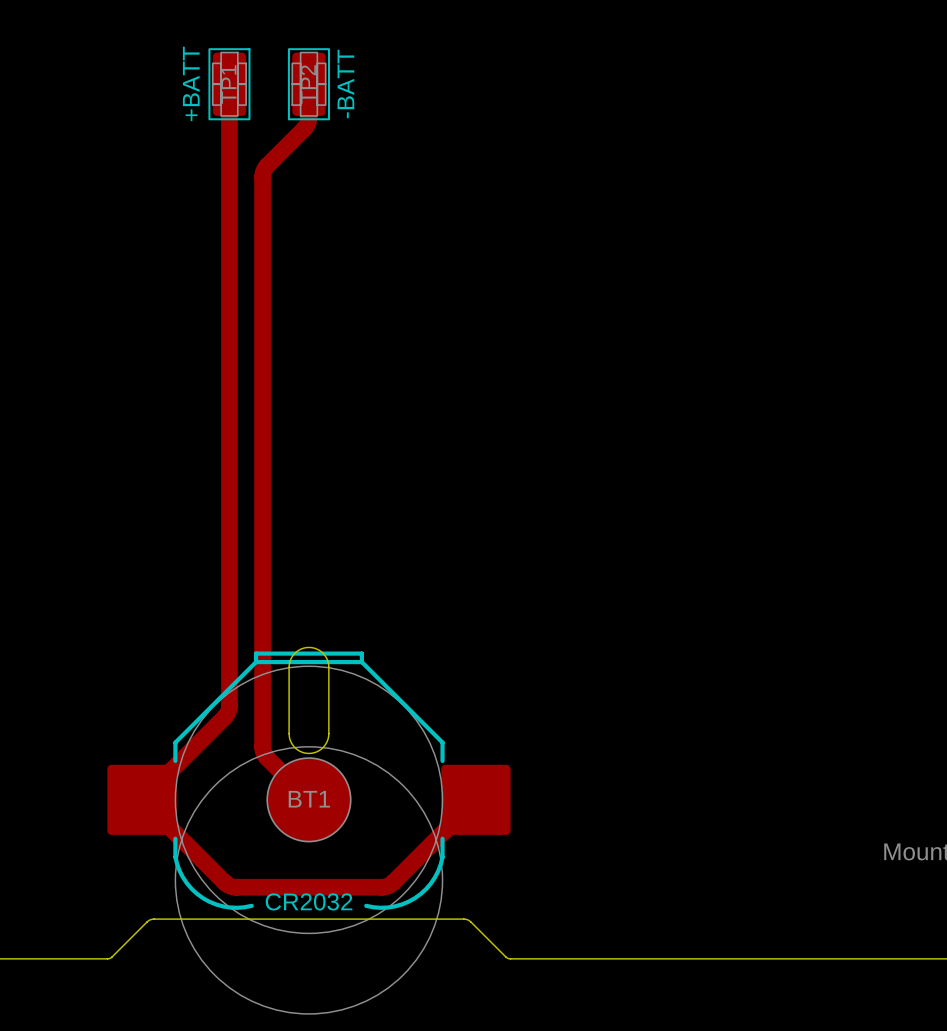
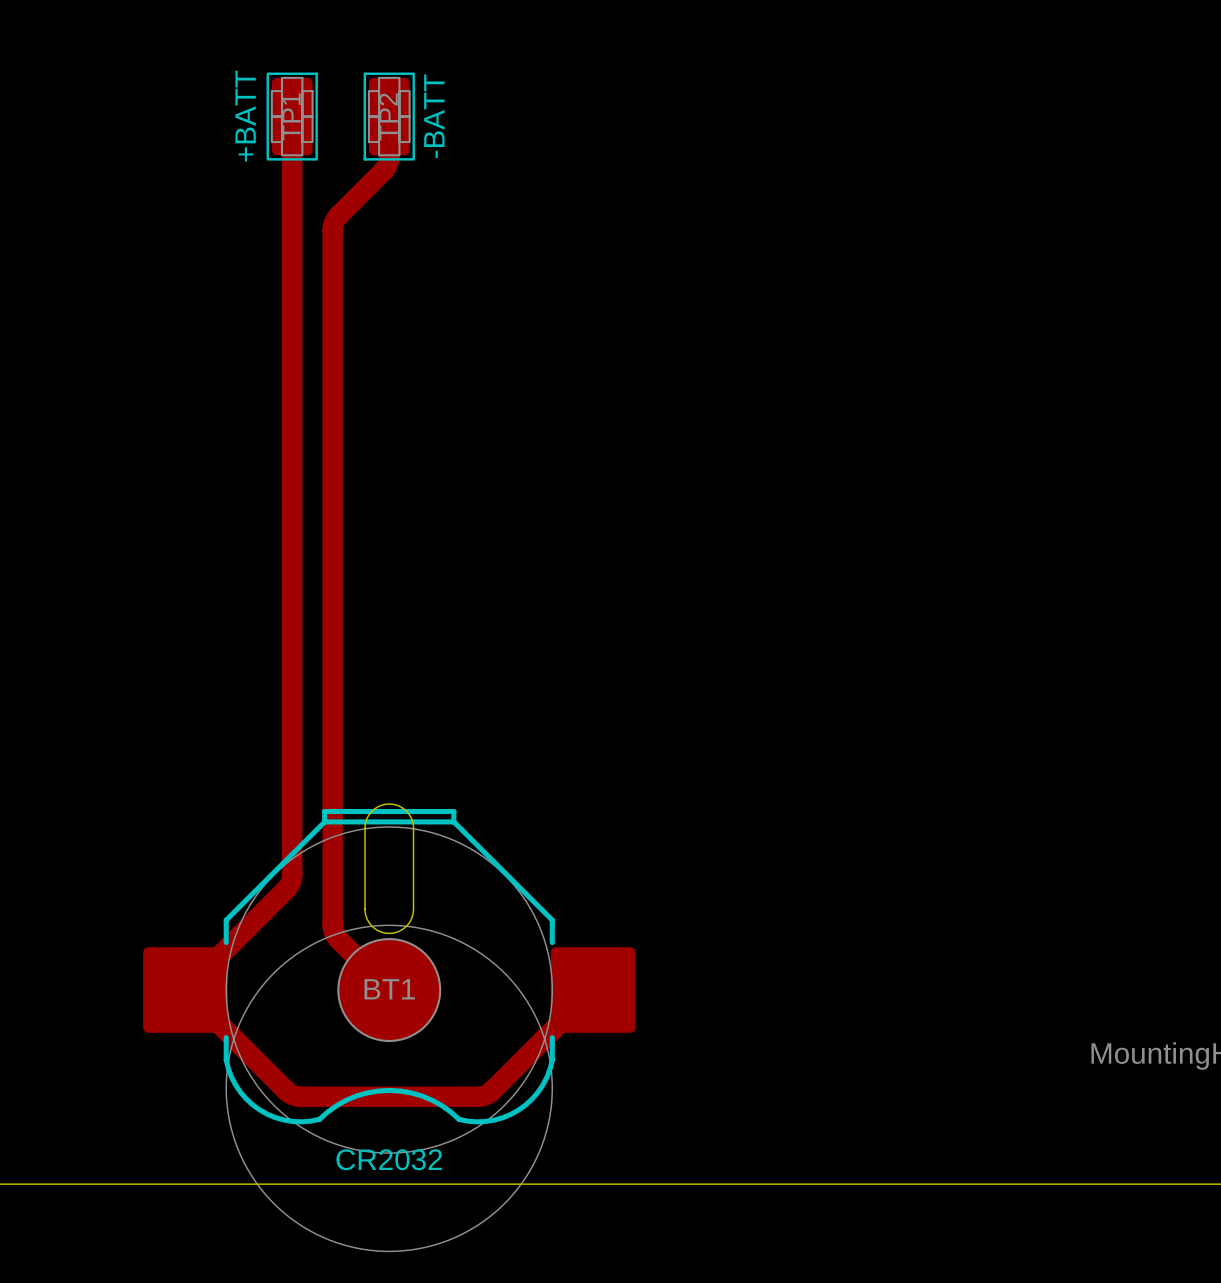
BT1 footprint: [107, 651, 511, 910] -> [143, 808, 636, 1125]
BT1 value position: CR2032 (308, 901) -> CR2032 (389, 1159)
board edge: (107, 958) (112, 956) (147, 921) (154, 919) (464, 919) (470, 921) (505, 956) (510, 958) -> (143, 1184) (635, 1184)

